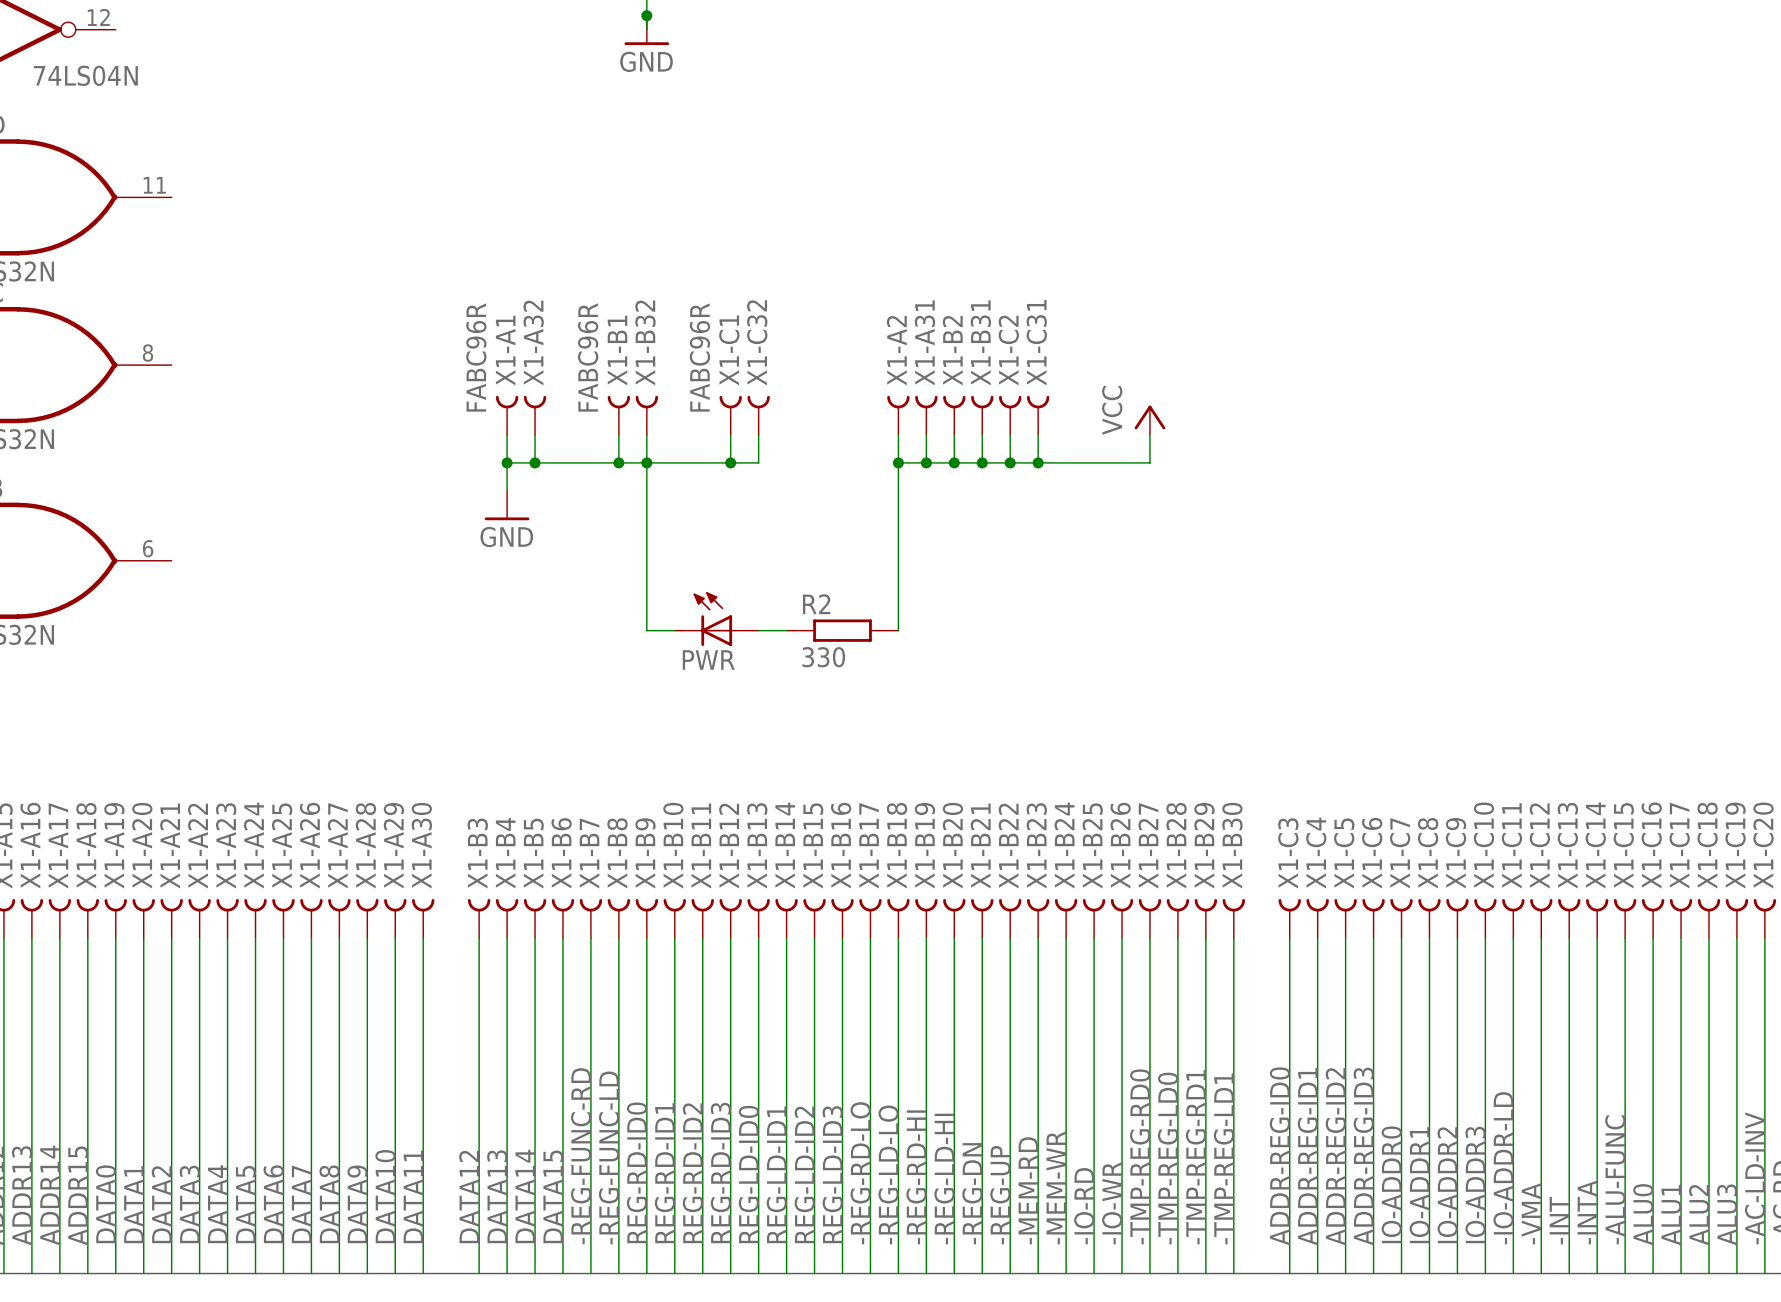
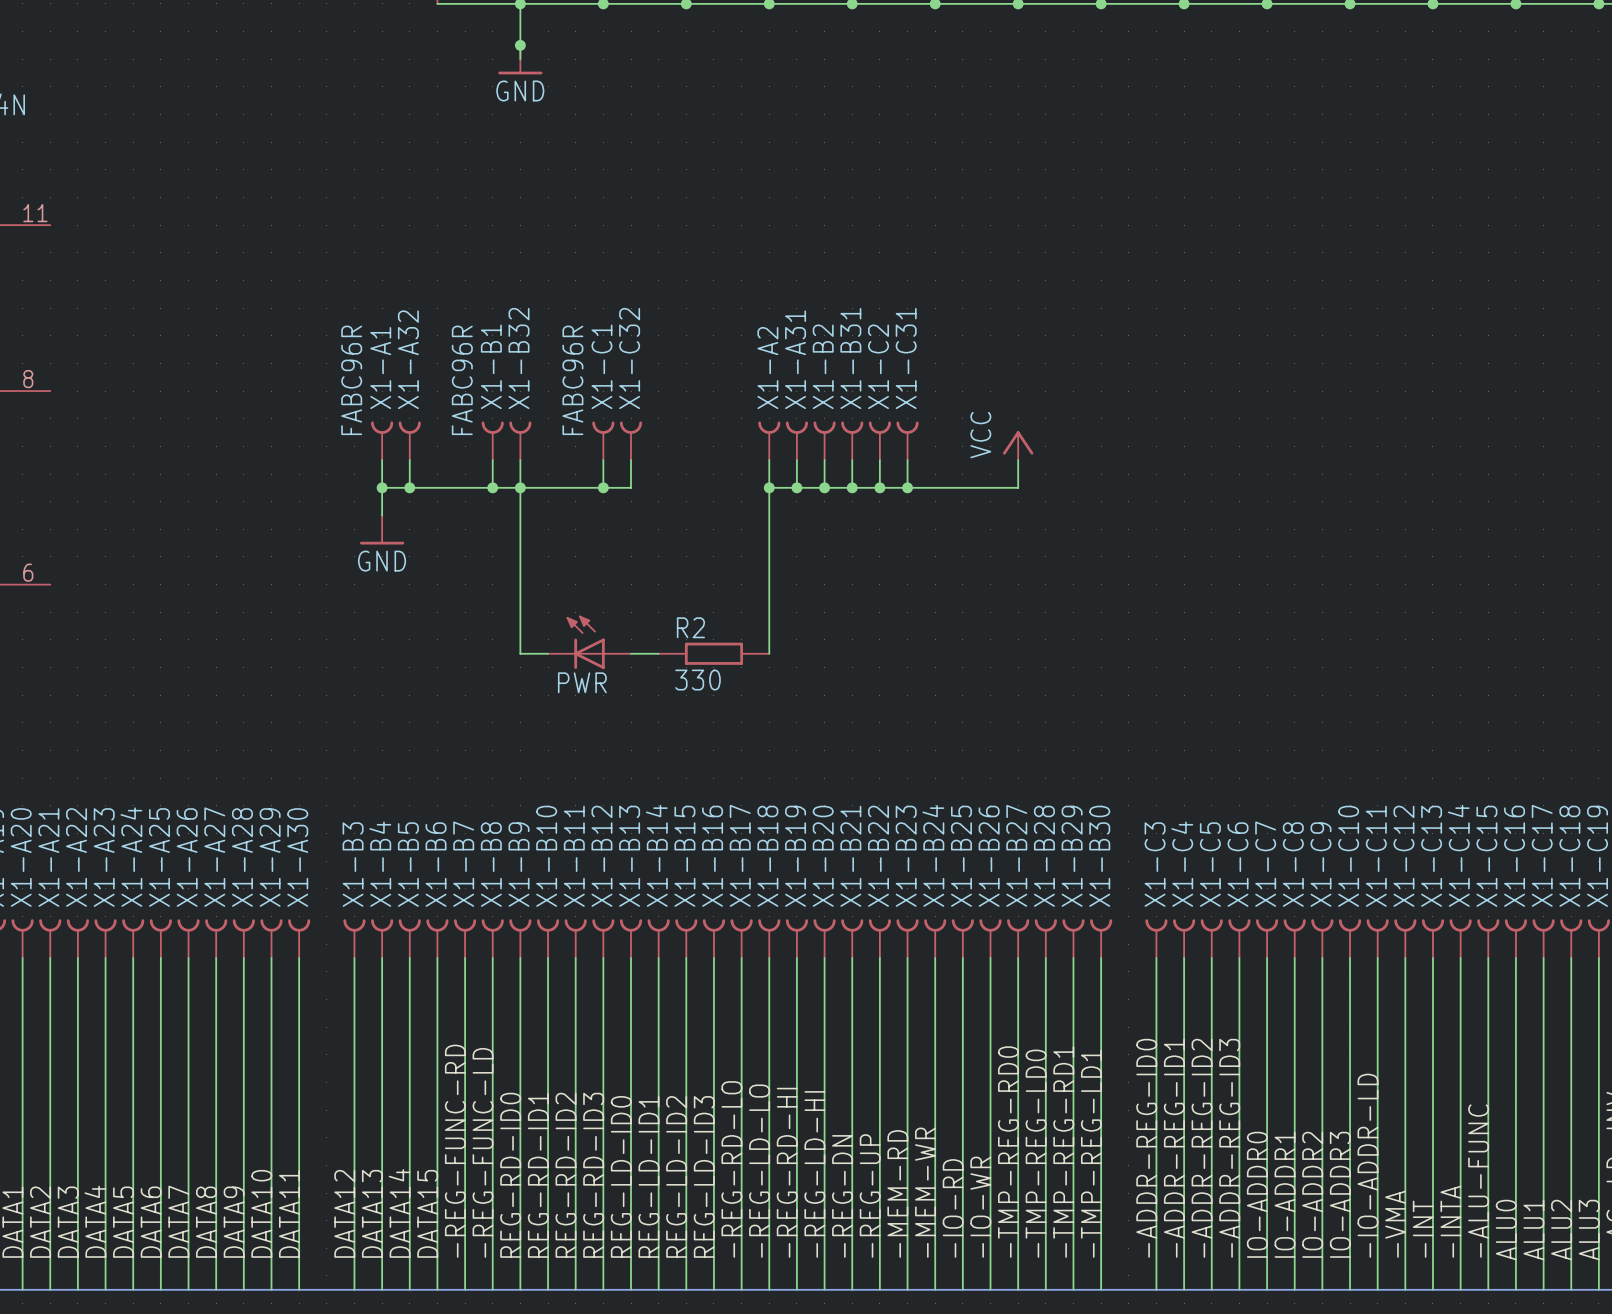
label: ADDR-REG-ID0 (1279, 1156) -> -ADDR-REG-ID0 (1146, 1148)
label: ADDR-REG-ID1 (1307, 1156) -> -ADDR-REG-ID1 (1174, 1148)
label: ADDR-REG-ID2 (1335, 1156) -> -ADDR-REG-ID2 (1202, 1148)
label: ADDR-REG-ID3 (1363, 1156) -> -ADDR-REG-ID3 (1229, 1148)

